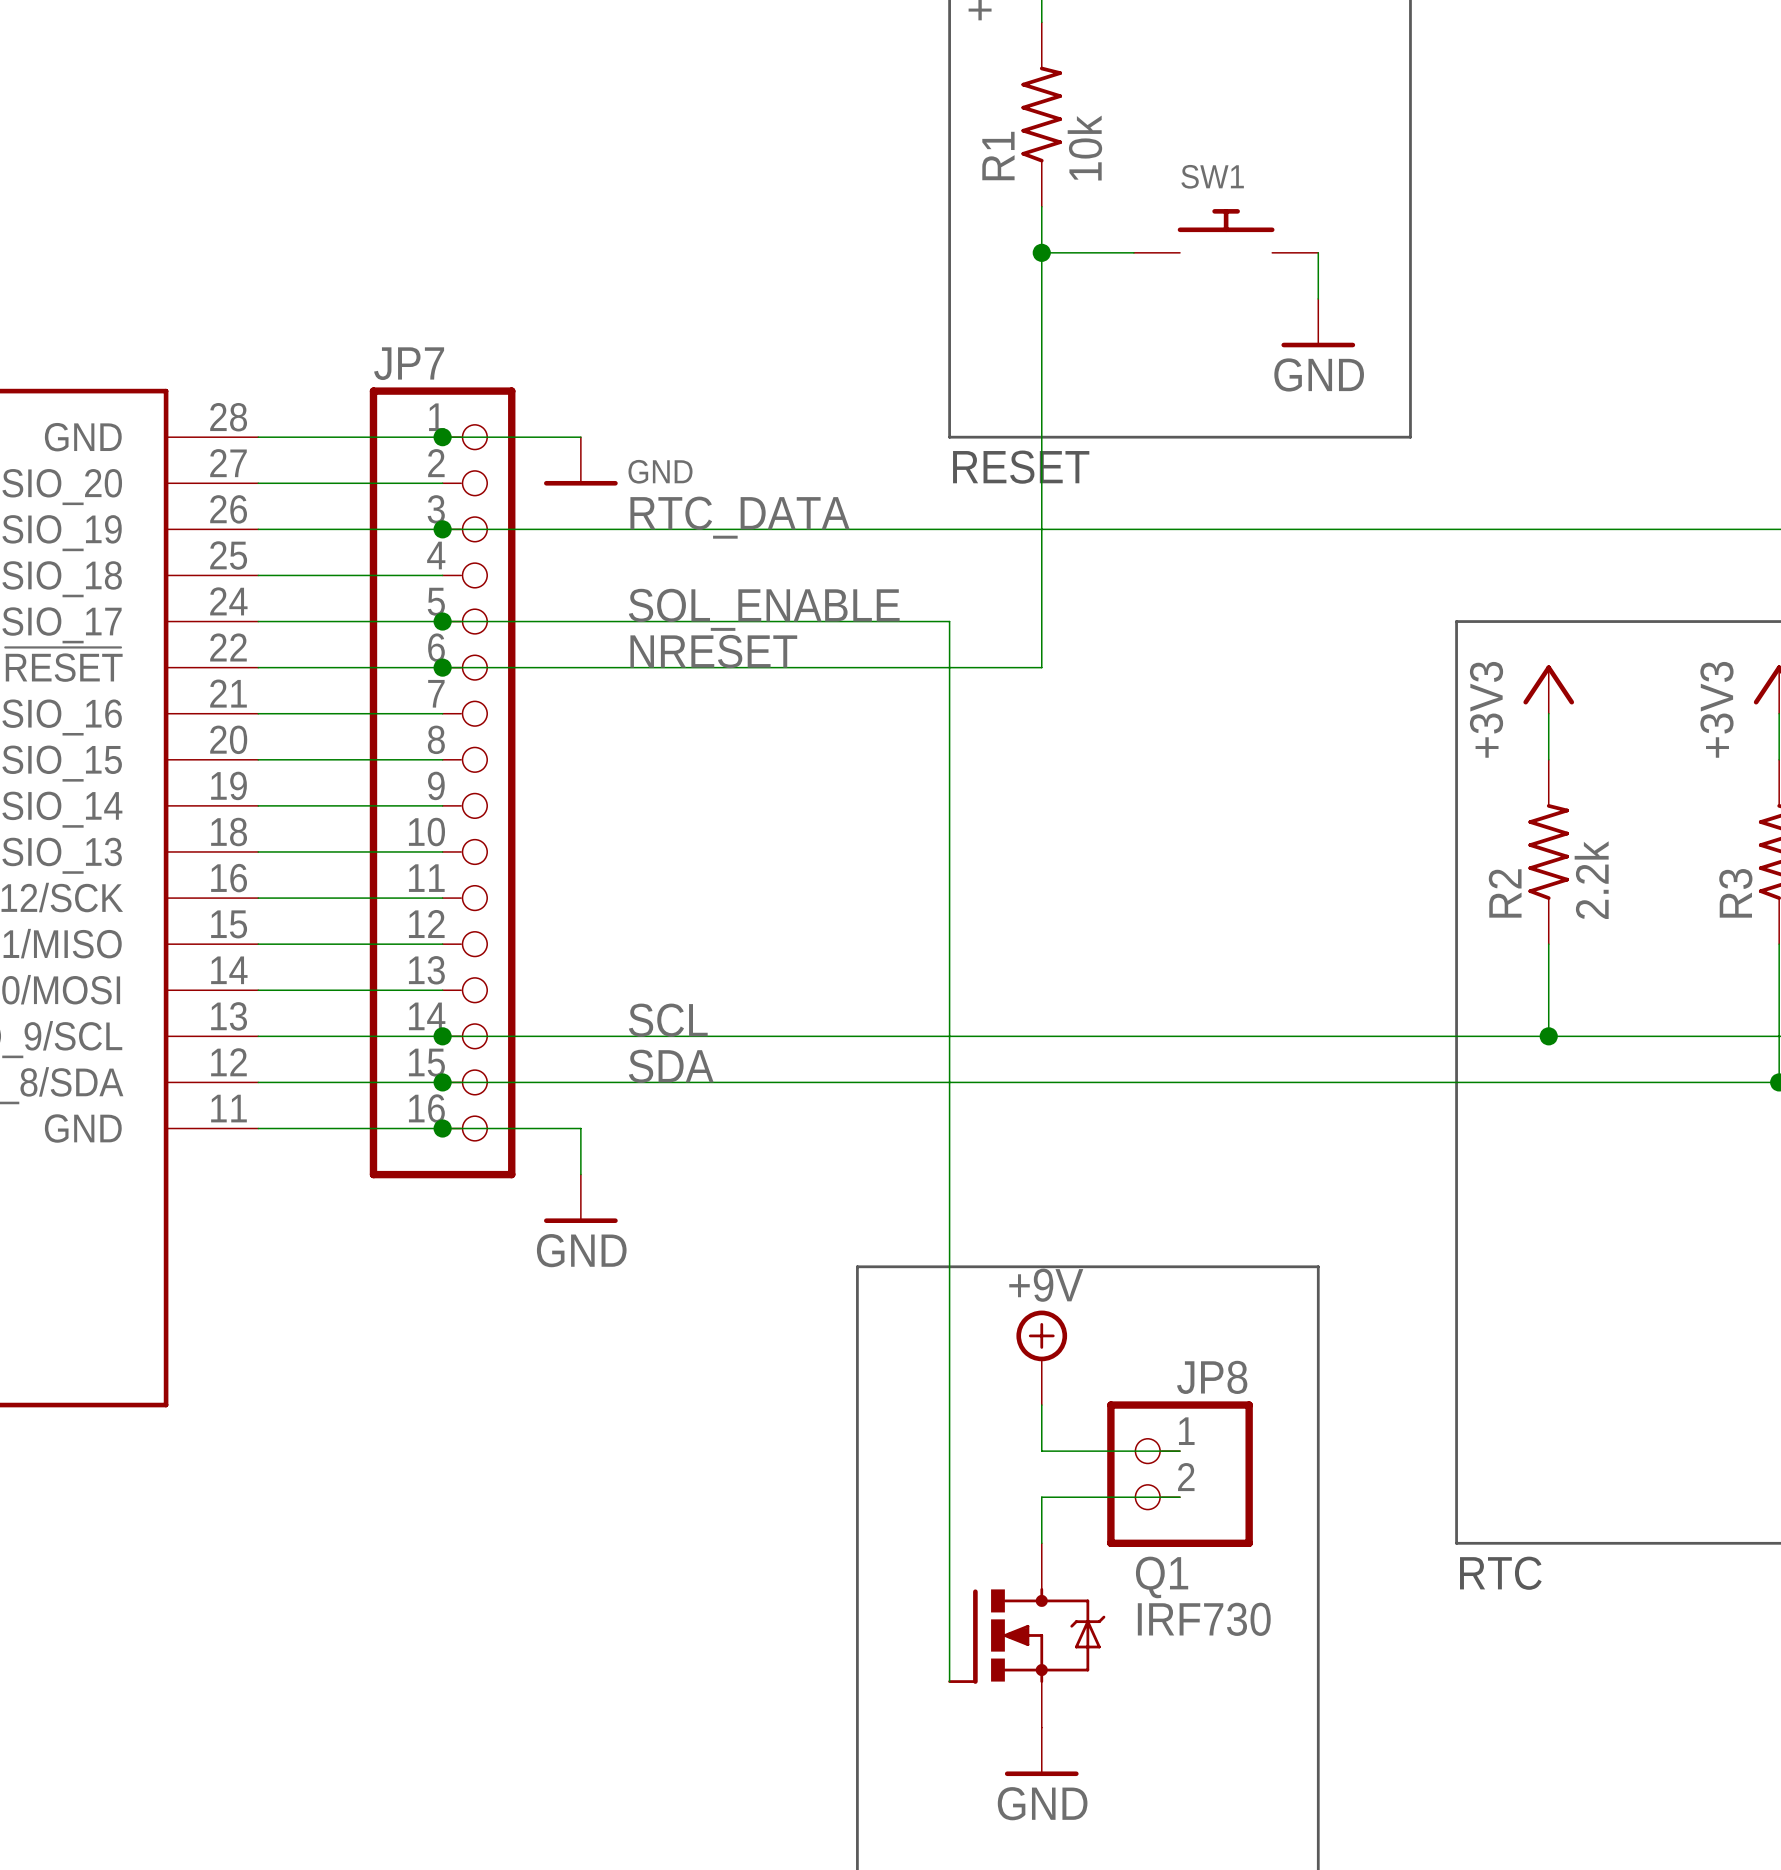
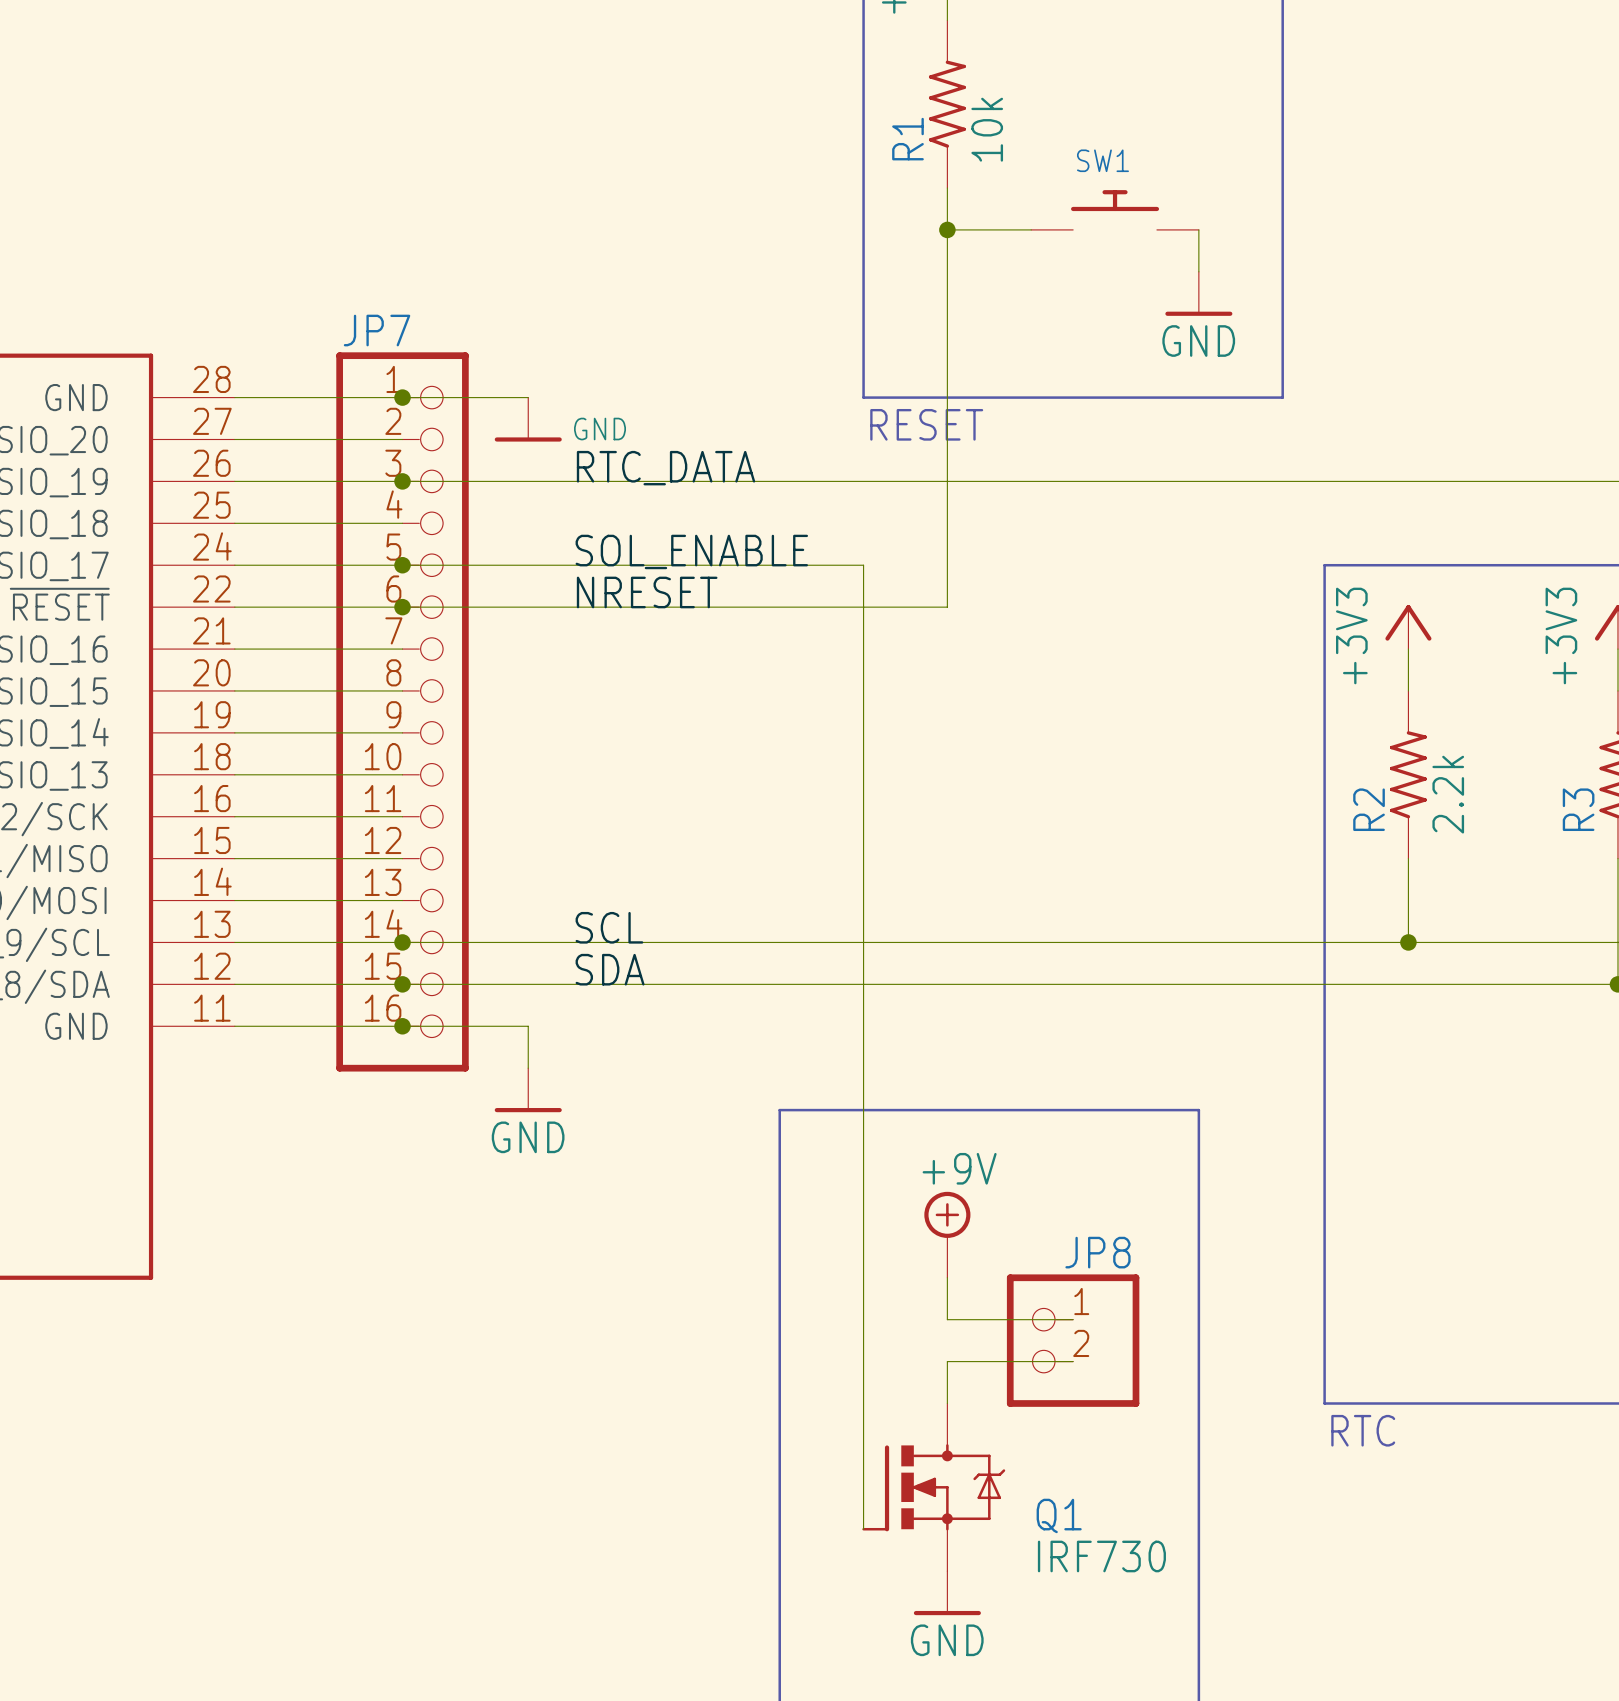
line: (857, 1266) (1318, 1266) -> (779, 1152) (779, 1110) (1198, 1110) (1198, 1152)
Q1 name position: Q1 (1162, 1577) -> Q1 (1059, 1515)
Q1 value position: IRF730 (1204, 1619) -> IRF730 (1101, 1556)

